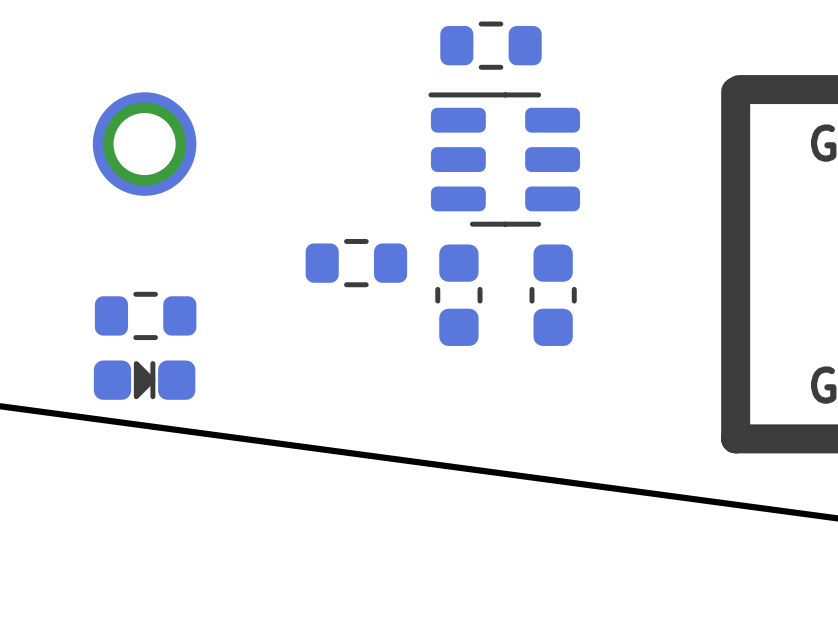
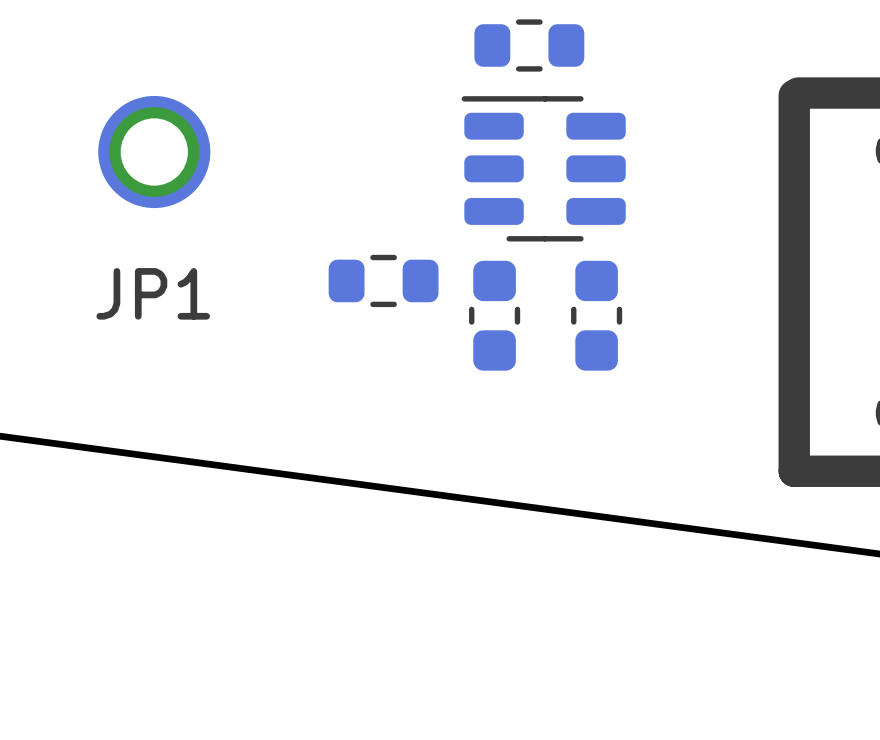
JP1 name: none -> JP1 (153, 293)
part: (145, 315) -> none
part: (144, 380) -> none

